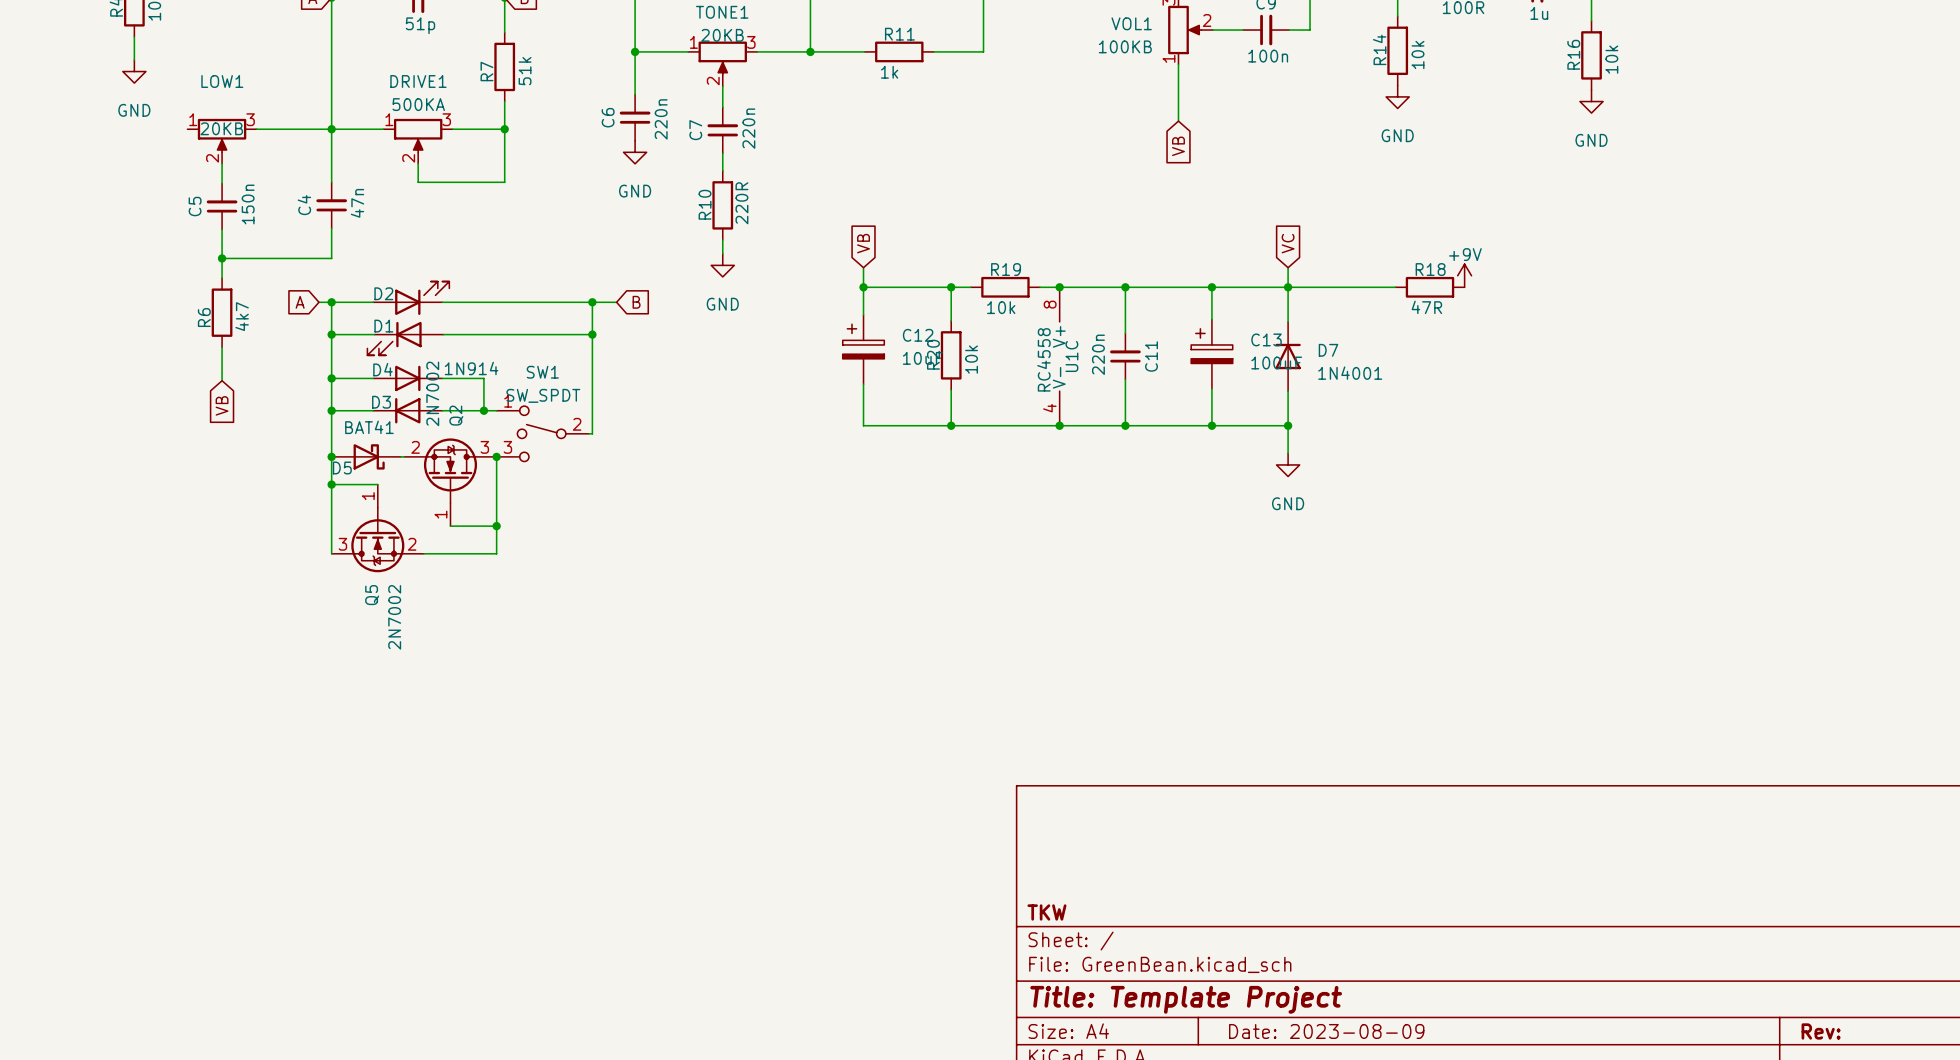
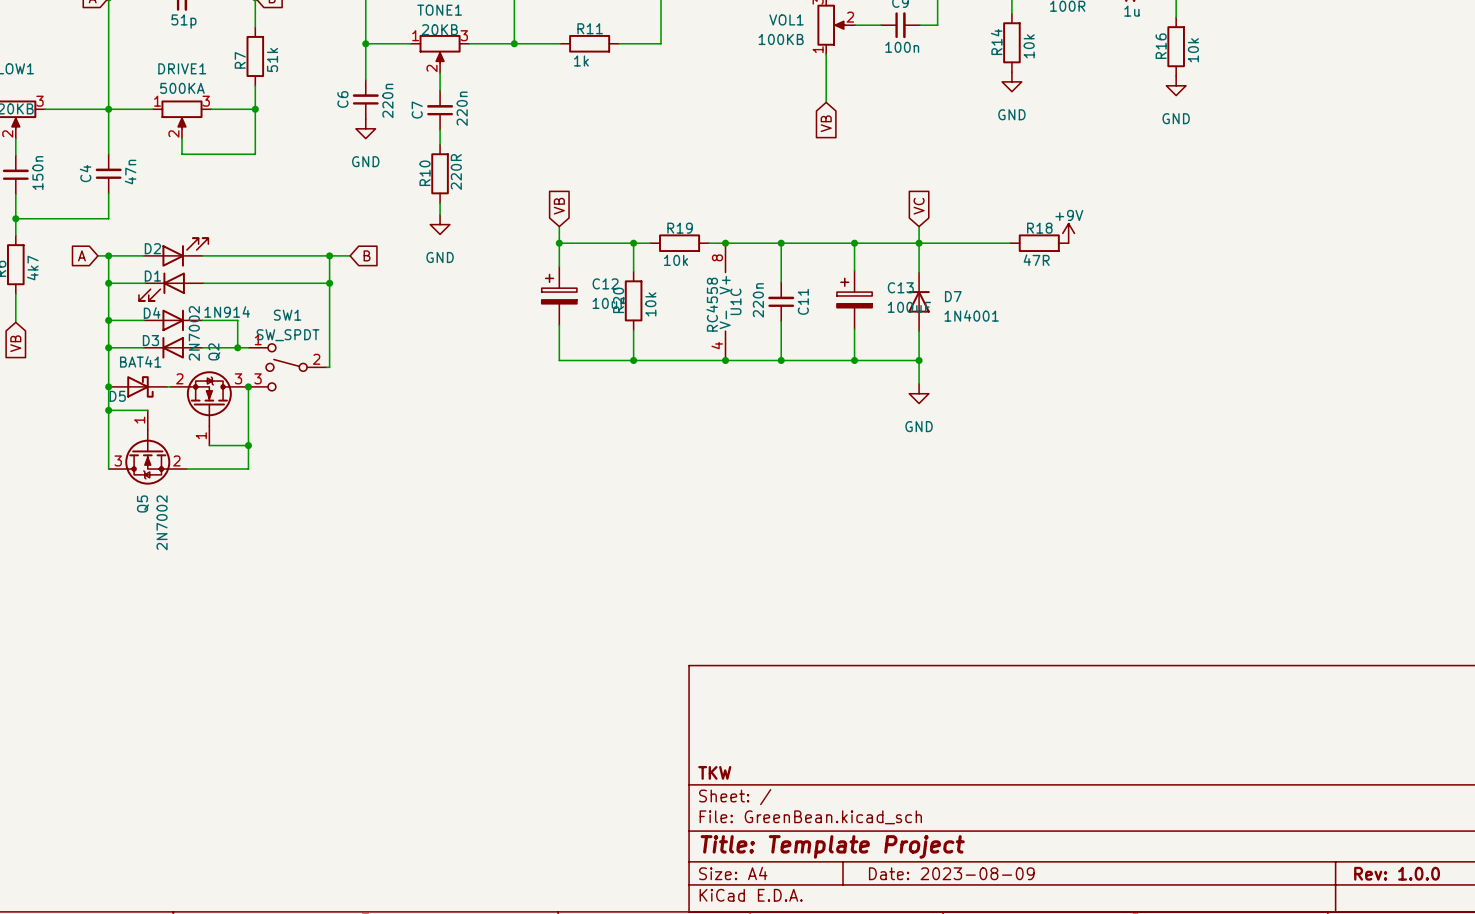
title block: Rev: (1821, 1031) -> Rev: 1.0.0 (1397, 873)

